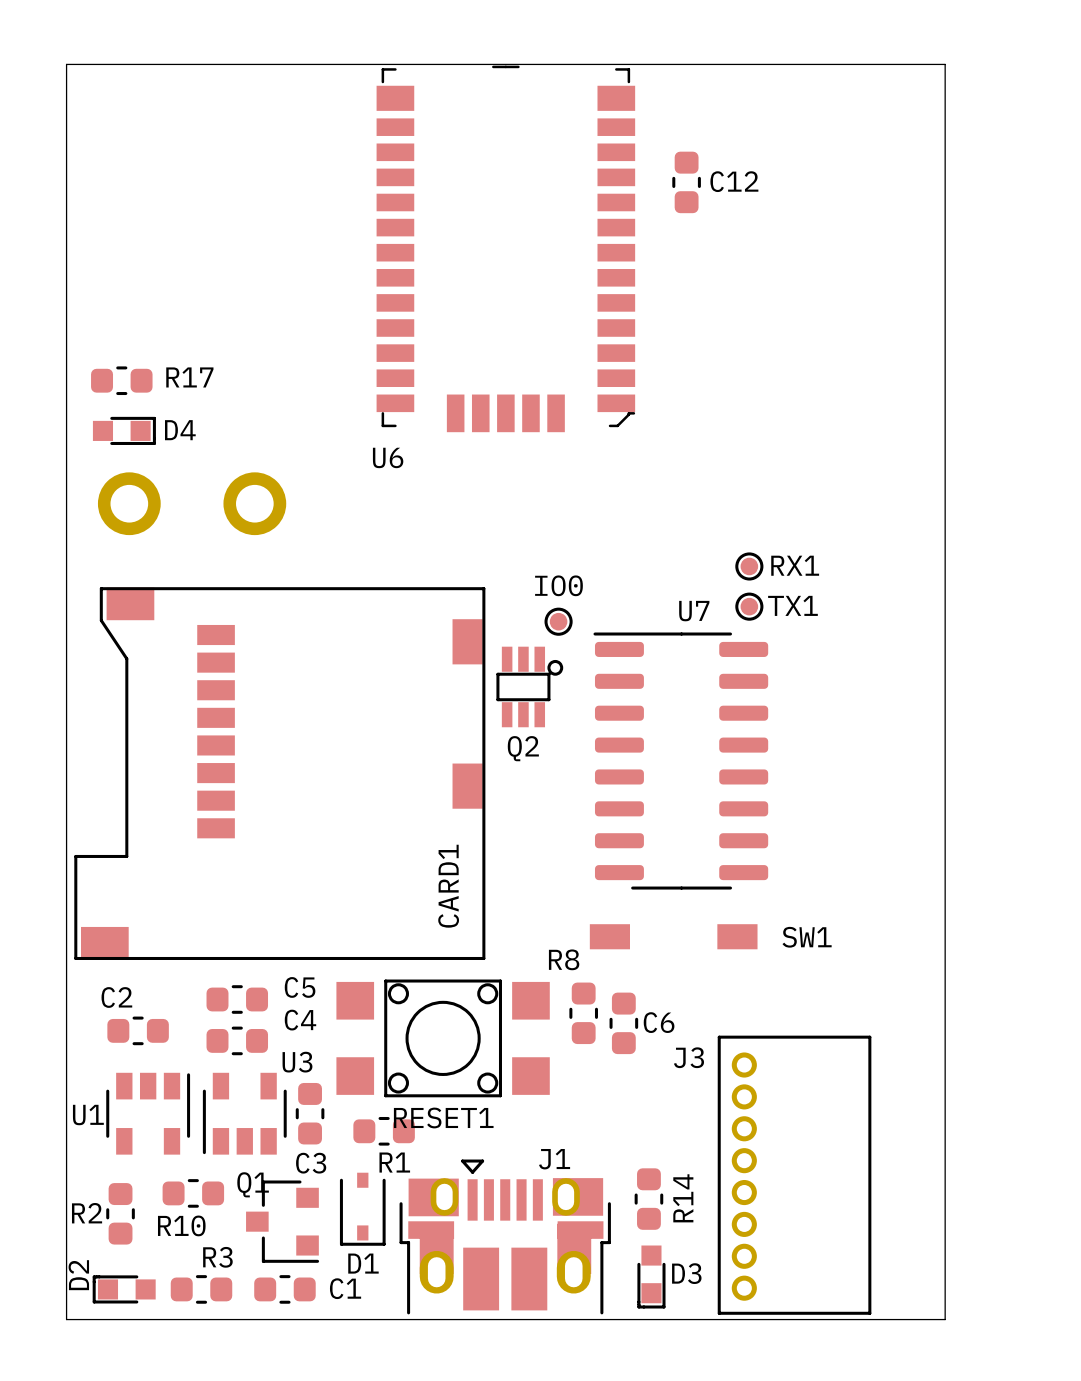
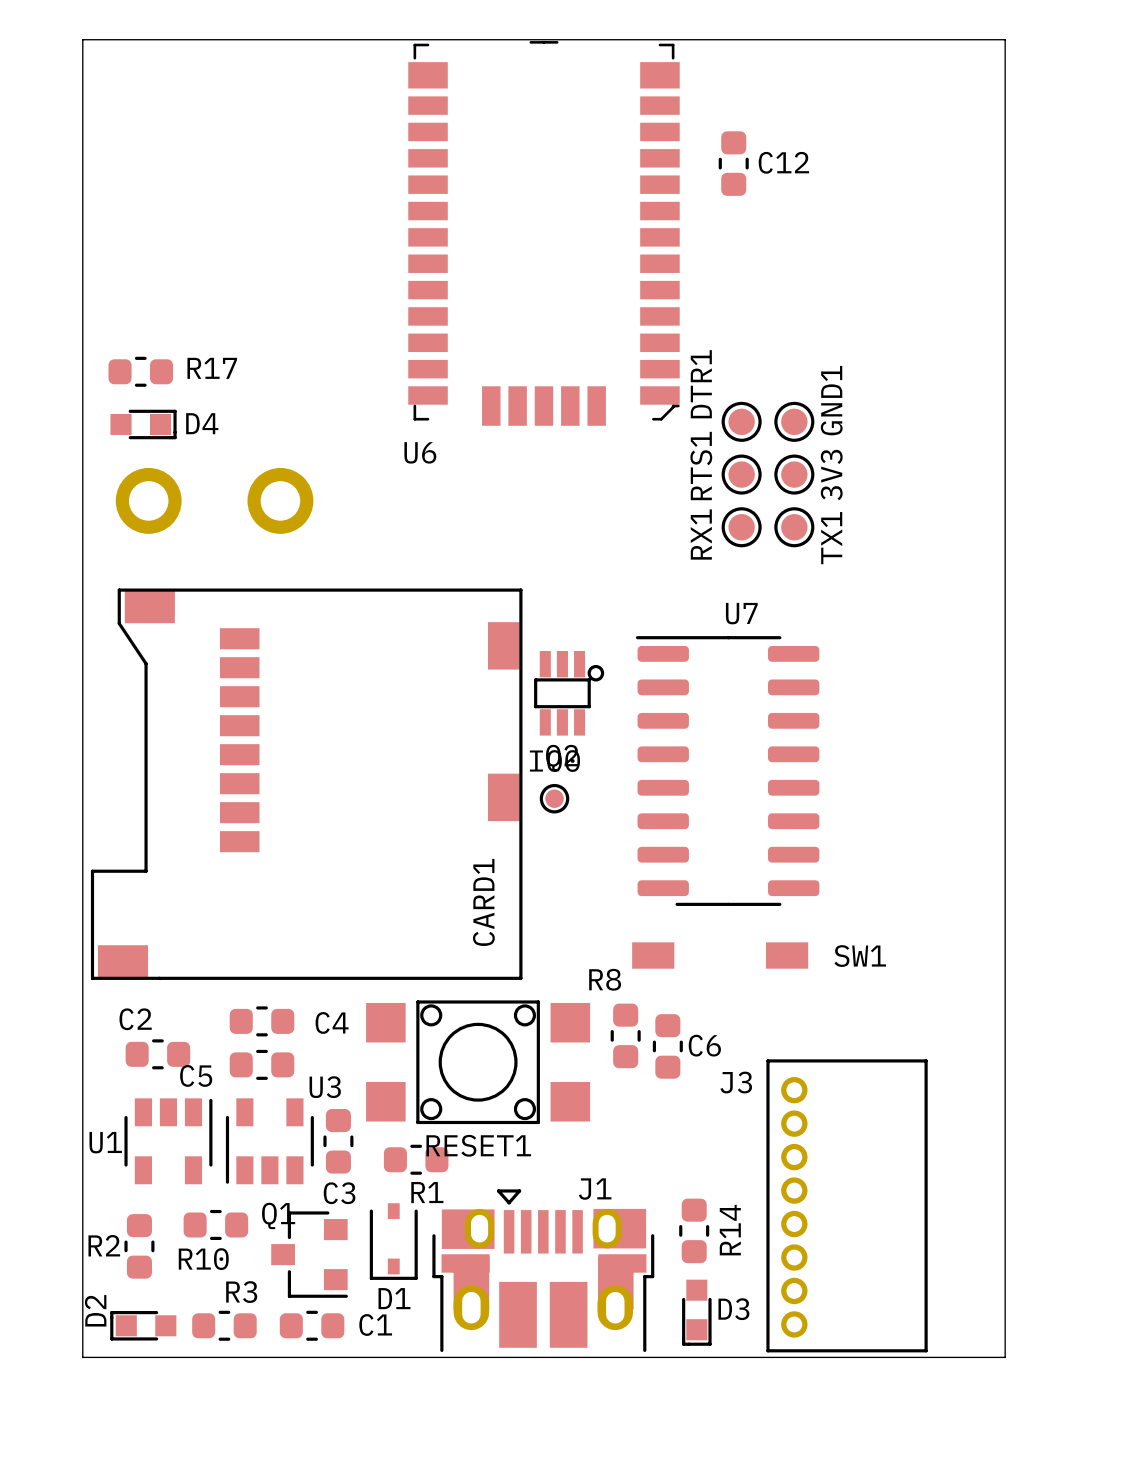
DTR1: none -> (741, 421)
GND1: none -> (794, 421)
RTS1: none -> (741, 474)
3V3: none -> (794, 474)
RX1 footprint: [735, 552, 764, 581] -> [721, 507, 762, 548]
RX1 name position: RX1 (795, 565) -> RX1 (701, 534)
TX1 footprint: [735, 592, 764, 621] -> [774, 507, 815, 548]
IO0 position: (558, 621) -> (554, 798)
C5 name: C5 (300, 987) -> C4 (332, 1022)
C4 name: C4 (300, 1020) -> C5 (196, 1075)

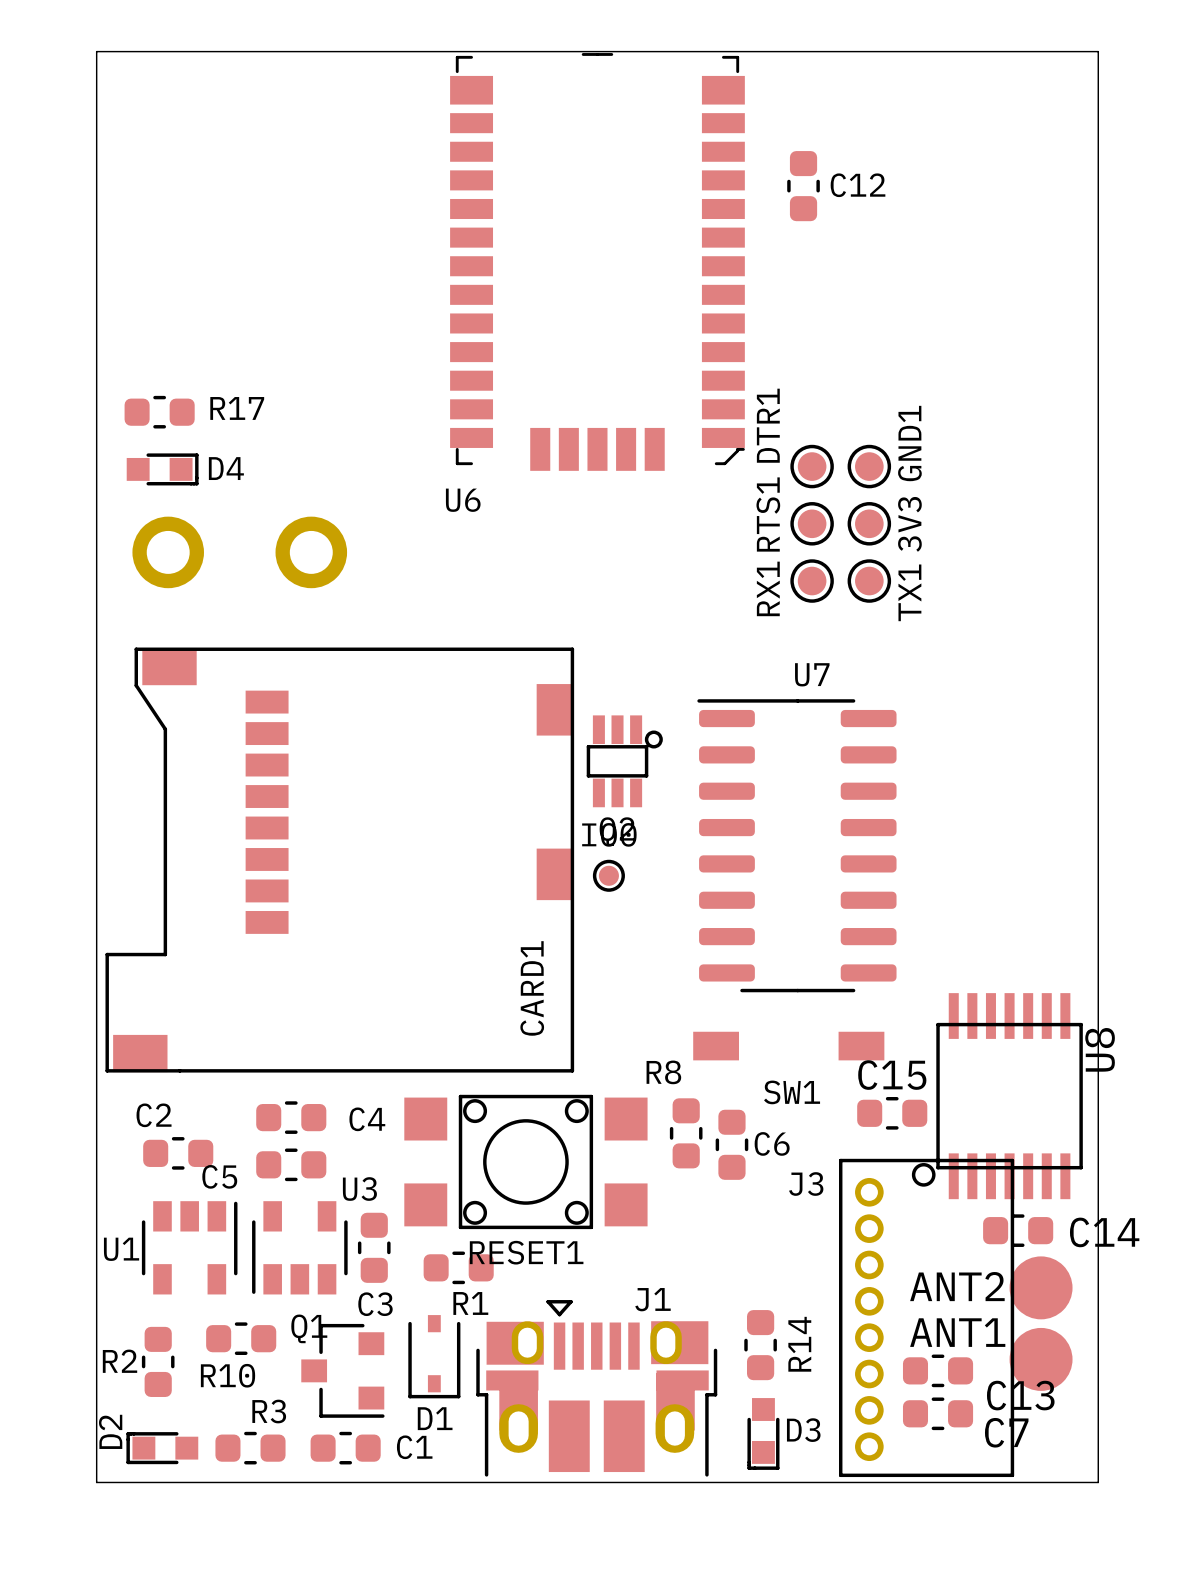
SW1 name position: SW1 (860, 956) -> SW1 (792, 1092)
U8: none -> (997, 1096)
C15: none -> (892, 1113)
C14: none -> (1018, 1230)
ANT2: none -> (1041, 1287)
ANT1: none -> (1041, 1359)
C13: none -> (938, 1370)
C7: none -> (938, 1413)

